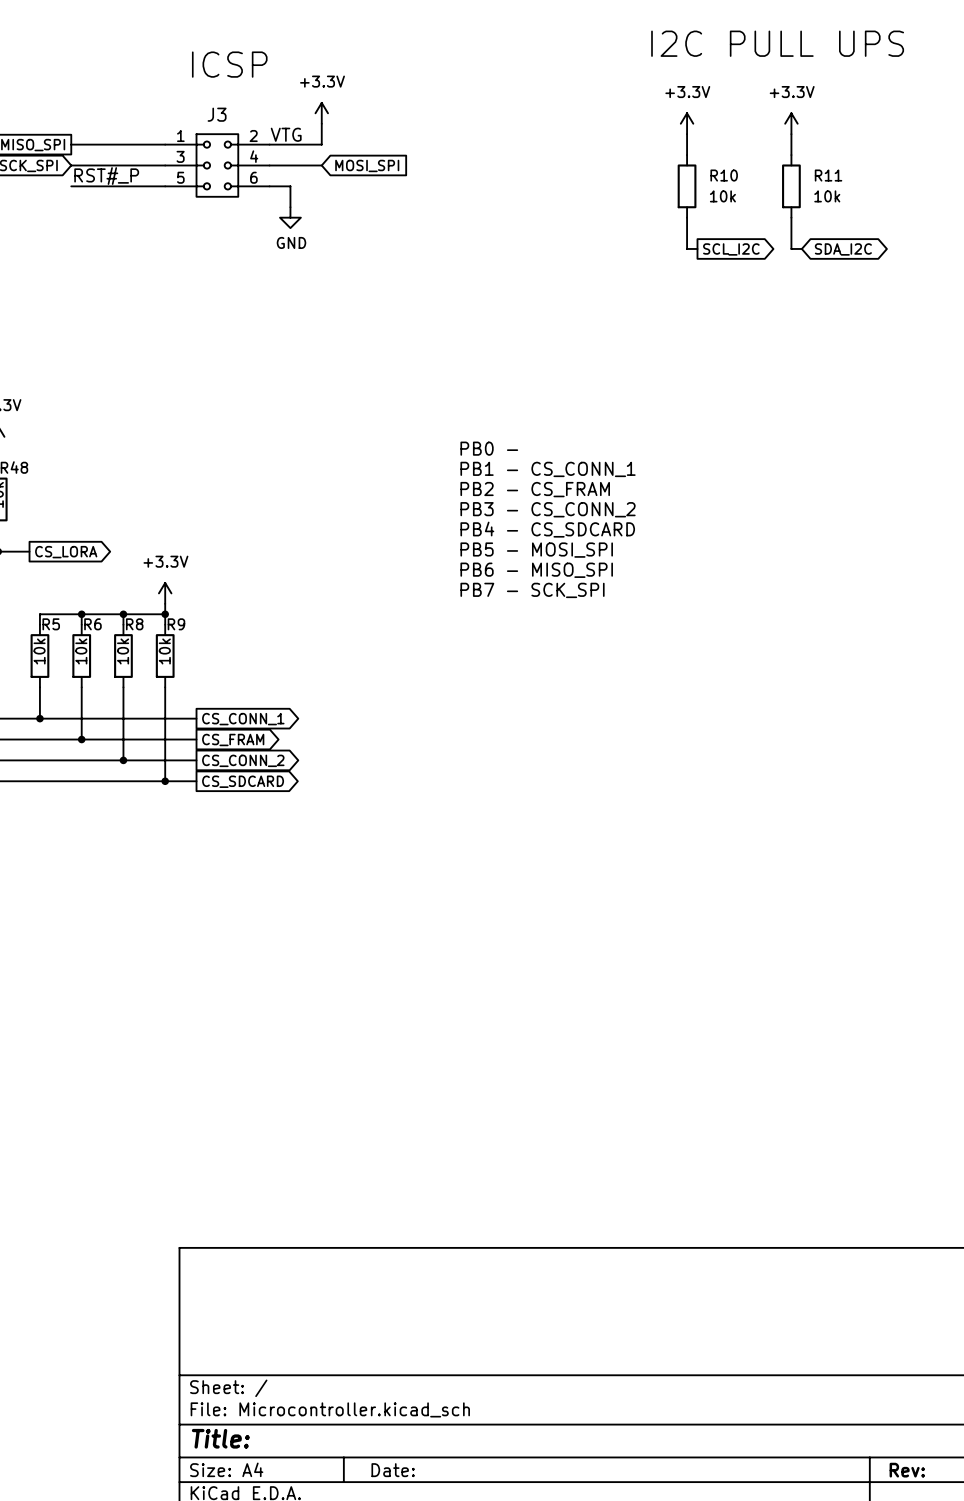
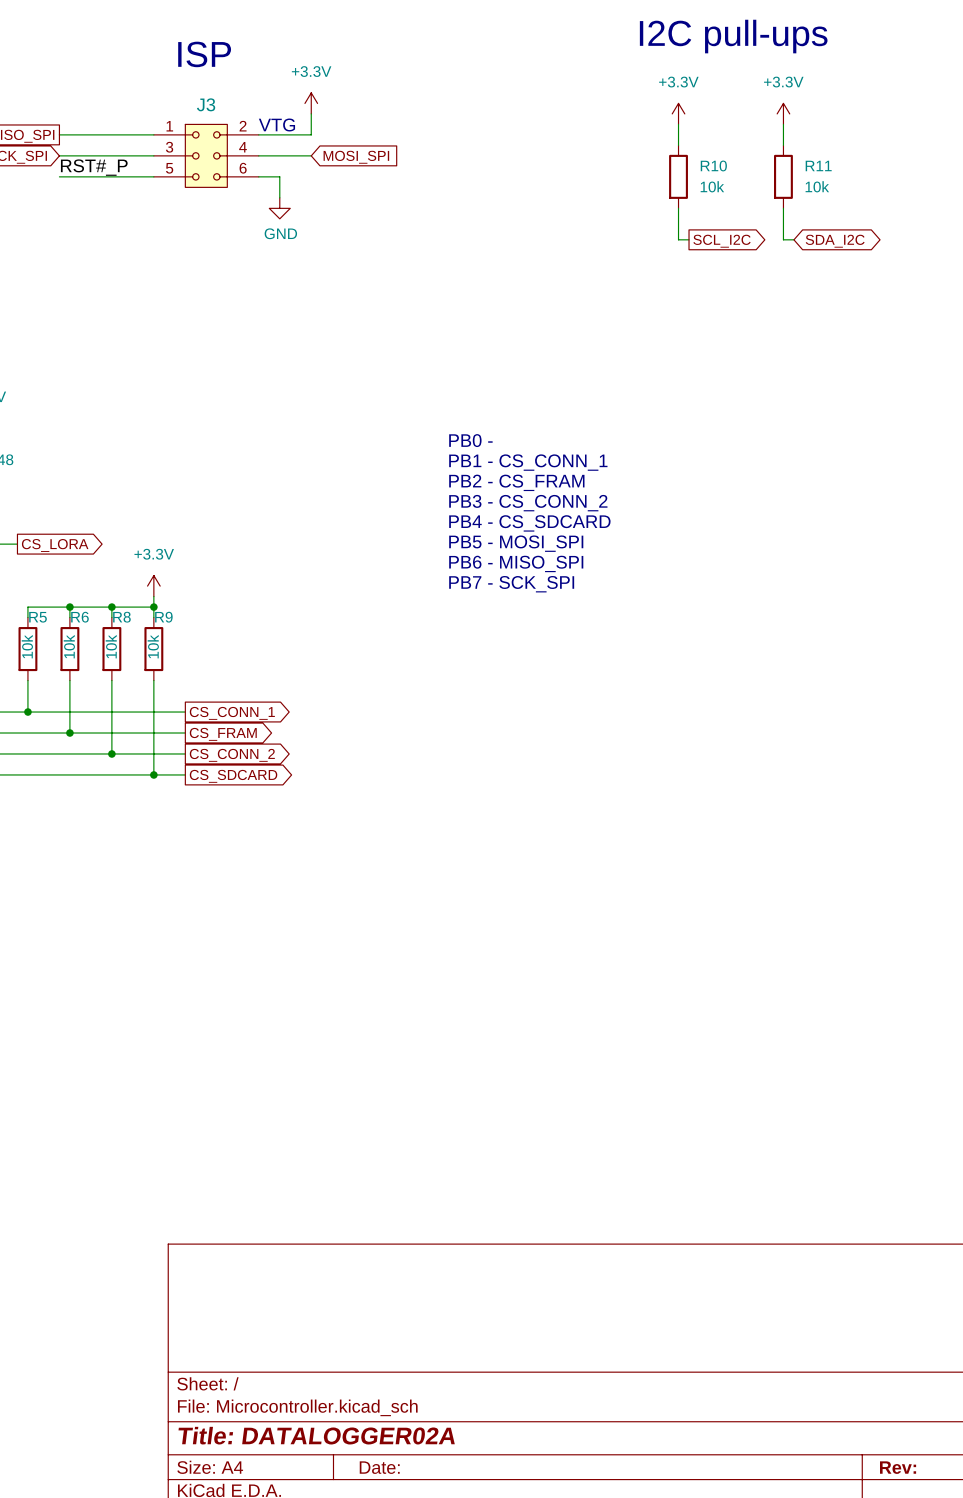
text: I2C PULL UPS (777, 43) -> I2C pull-ups (733, 36)
text: ICSP (229, 64) -> ISP (204, 54)
title block: Title: (220, 1438) -> Title: DATALOGGER02A (316, 1435)

